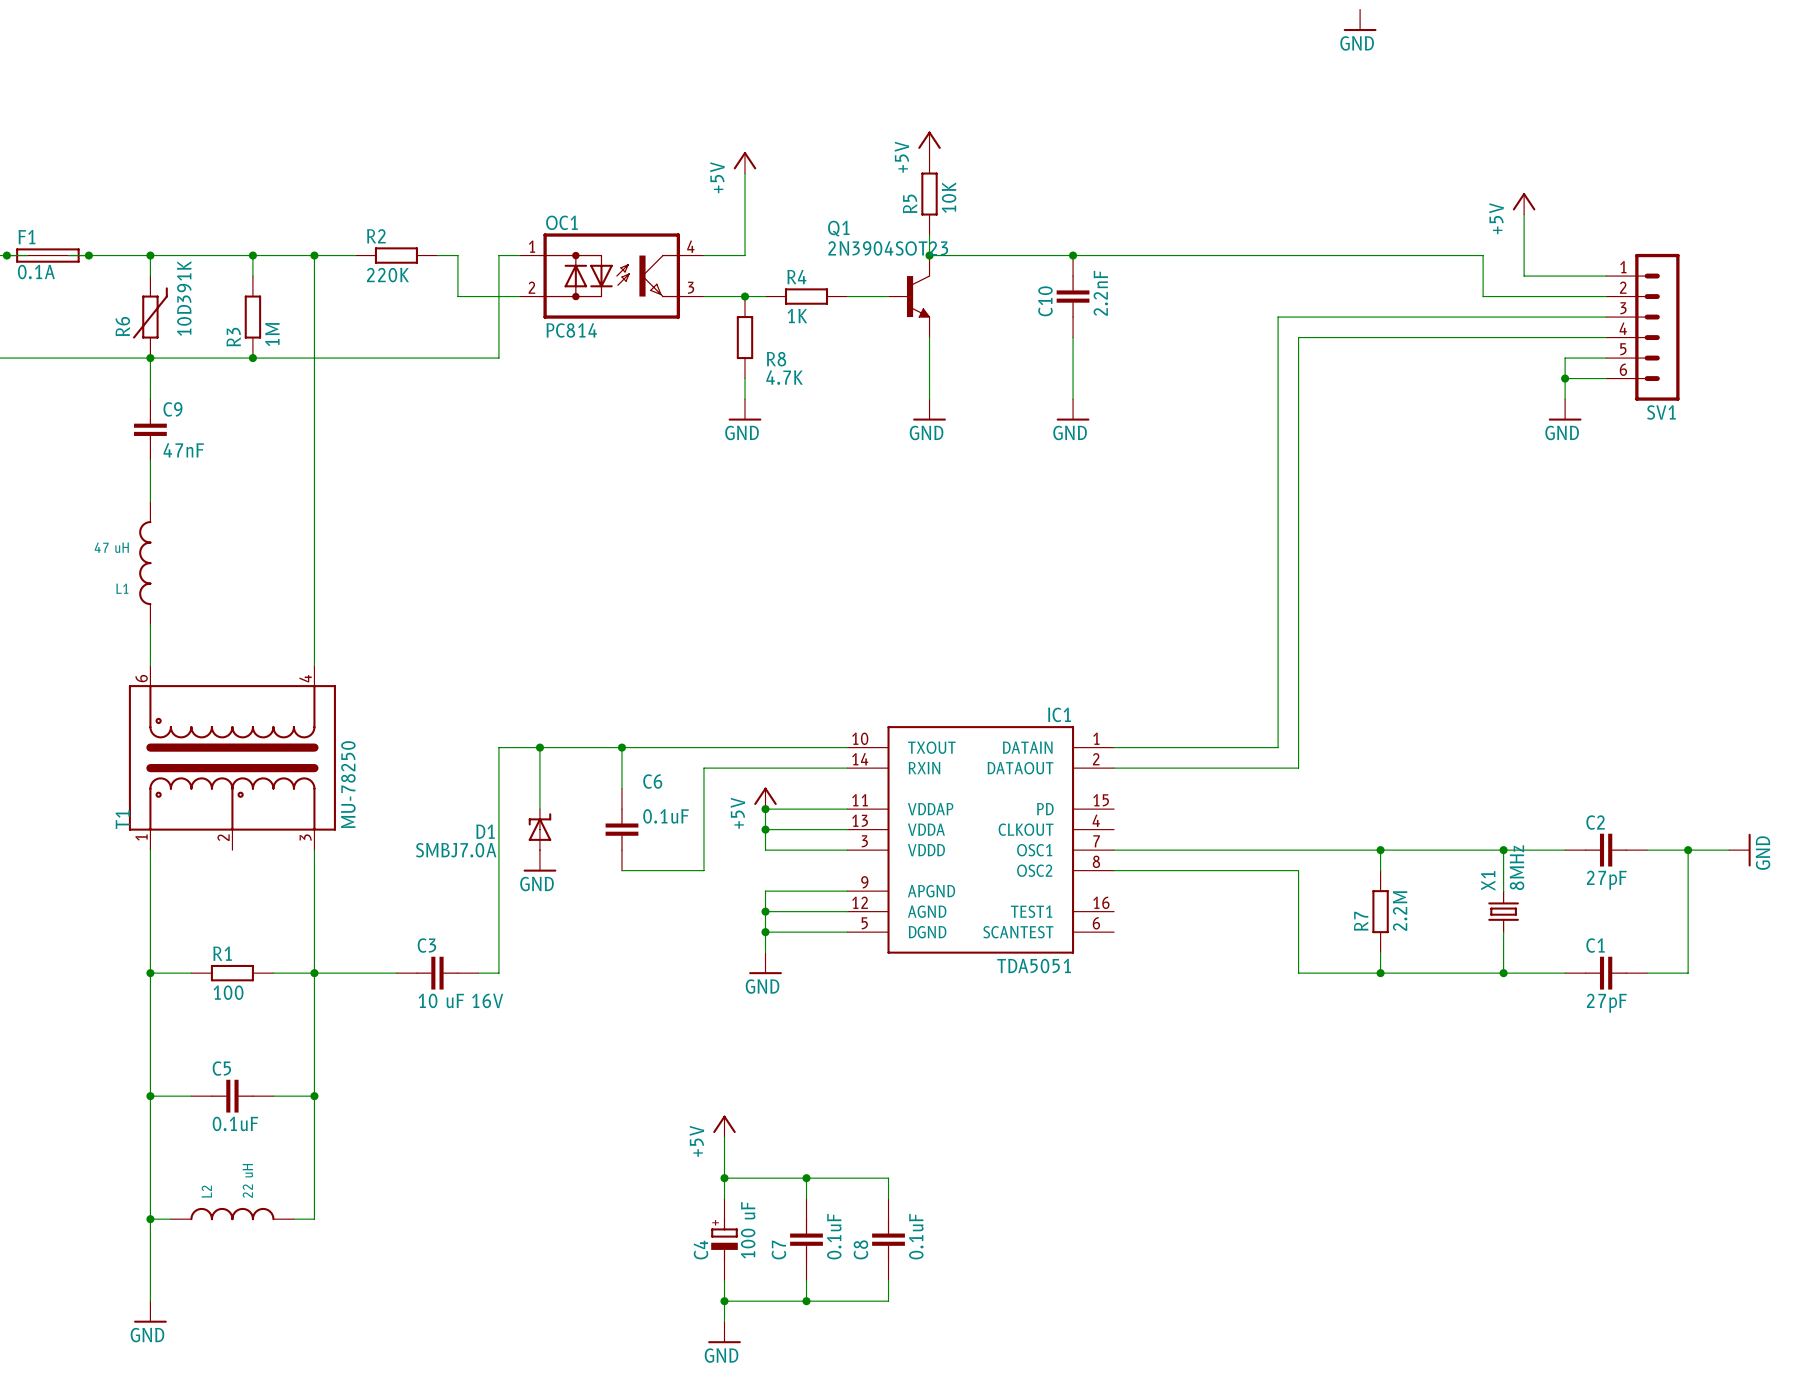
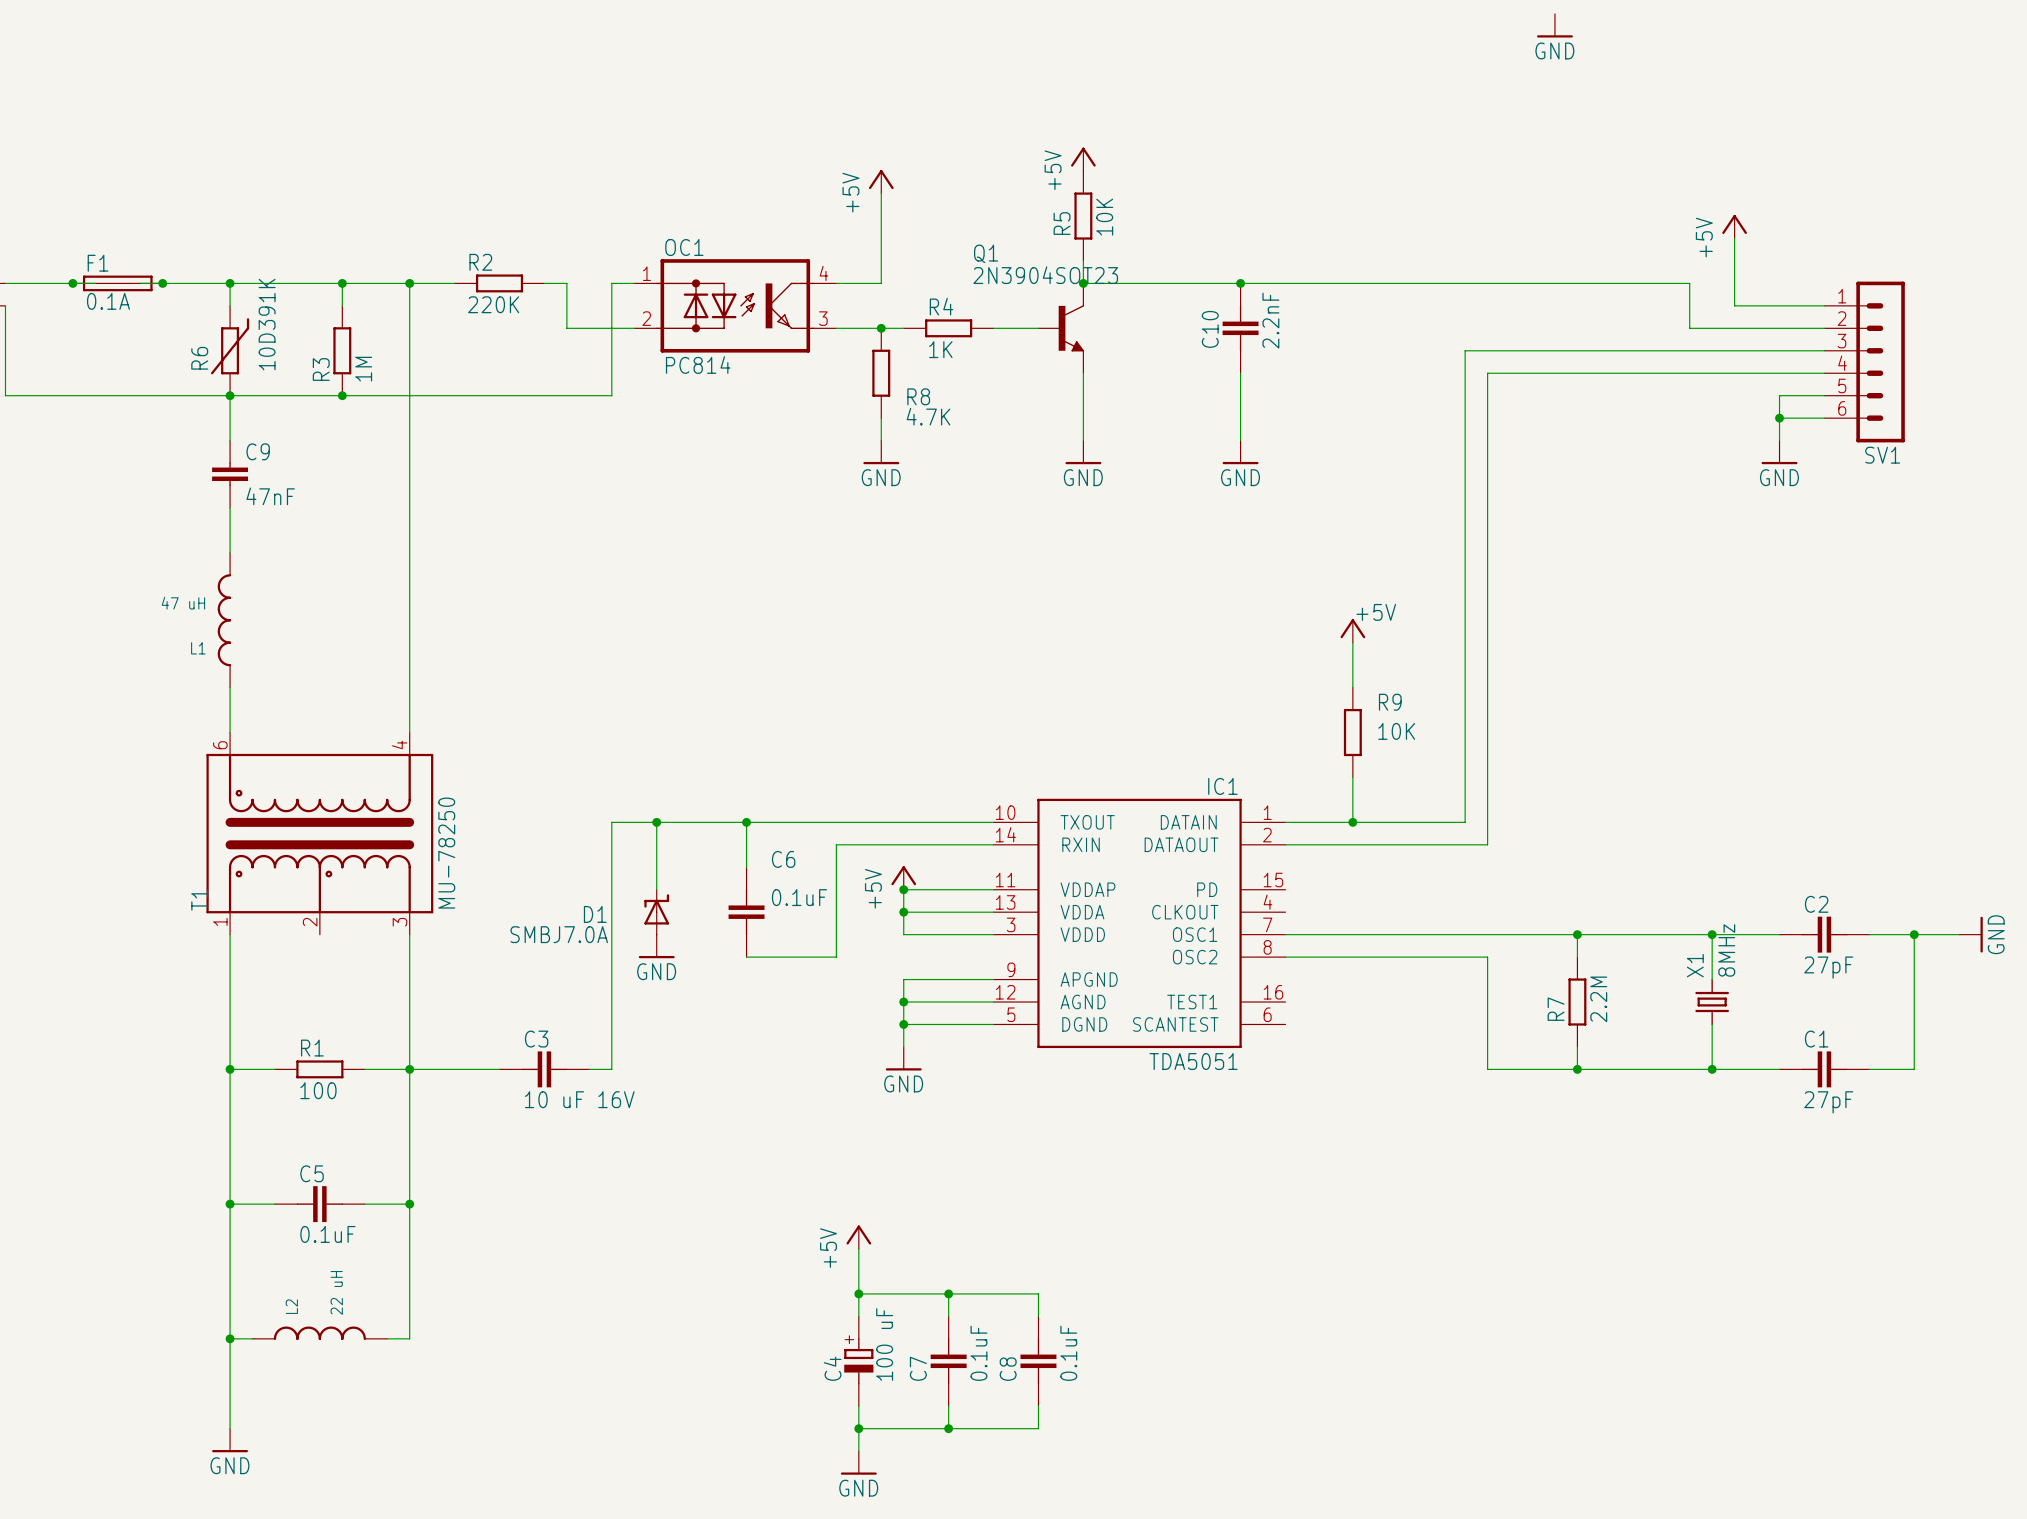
power symbol: none -> +5V (1352, 630)
wire: none -> (1352, 642) (1352, 687)
R9: none -> 10K (1352, 732)
wire: none -> (1352, 777) (1352, 822)
junction: none -> (1352, 822)

